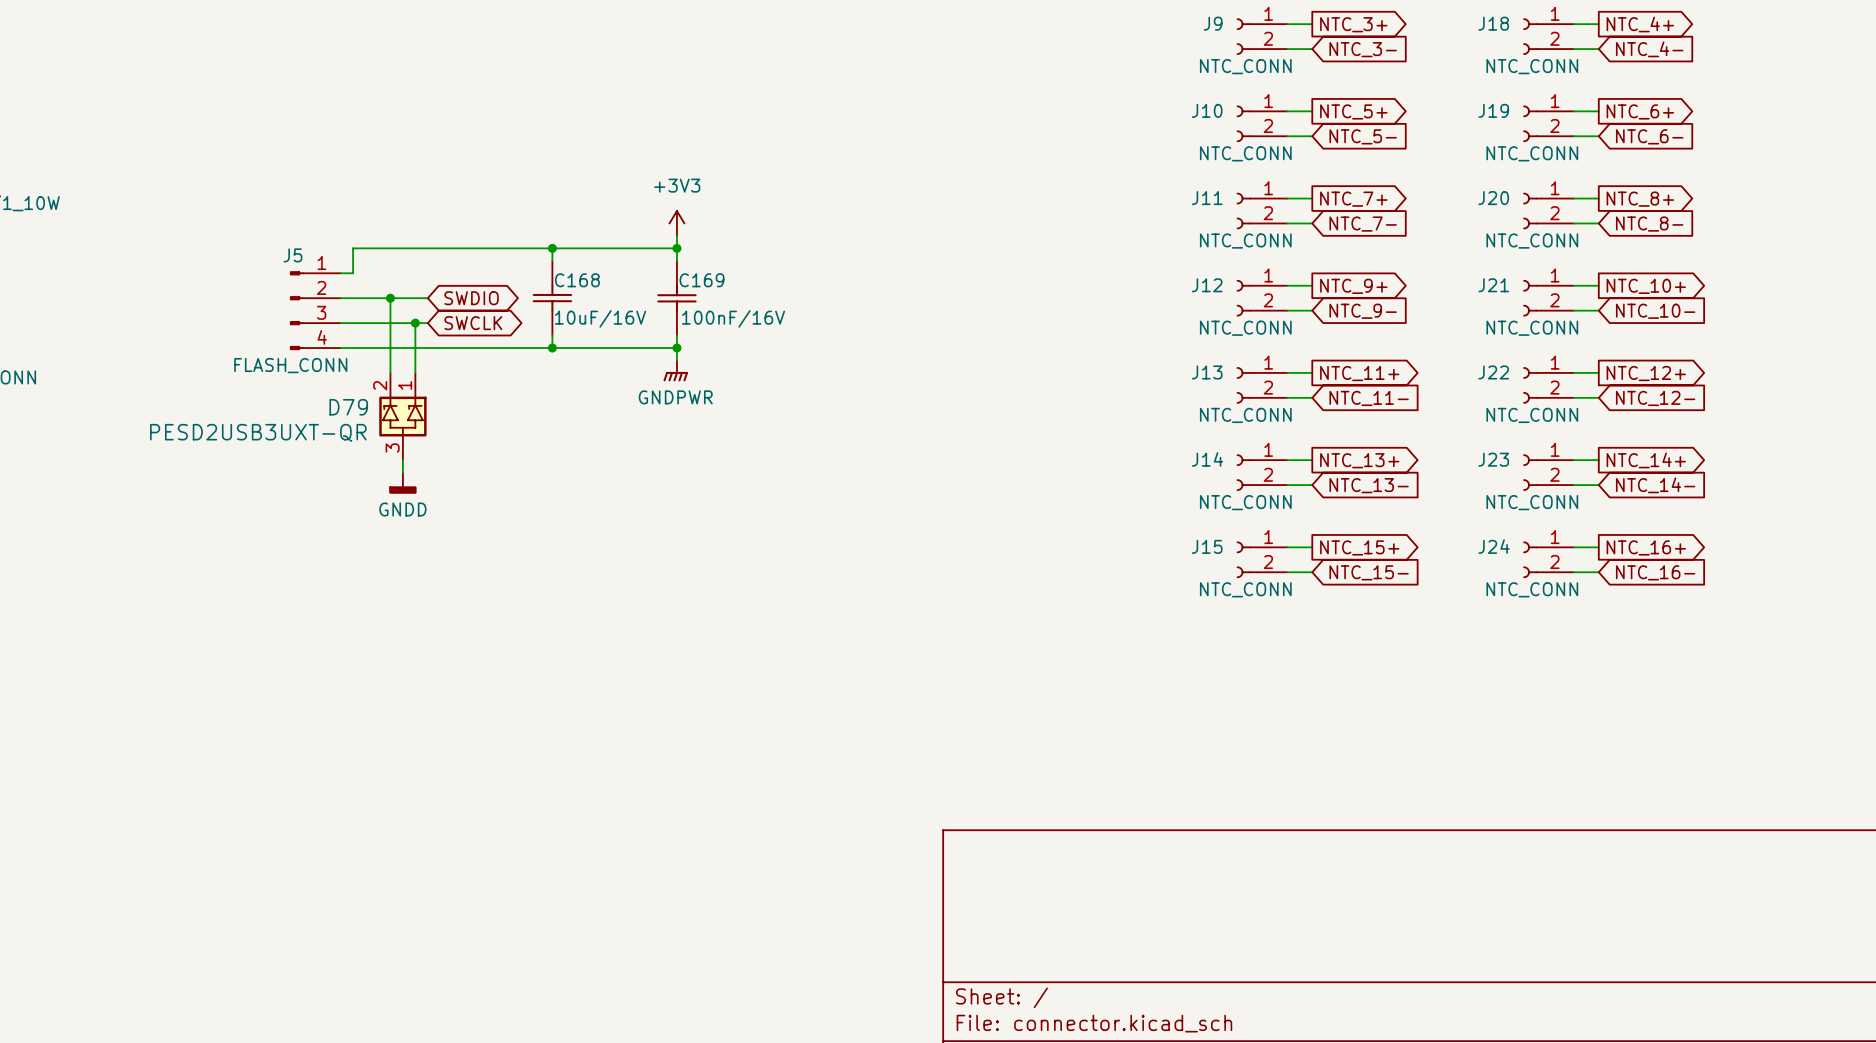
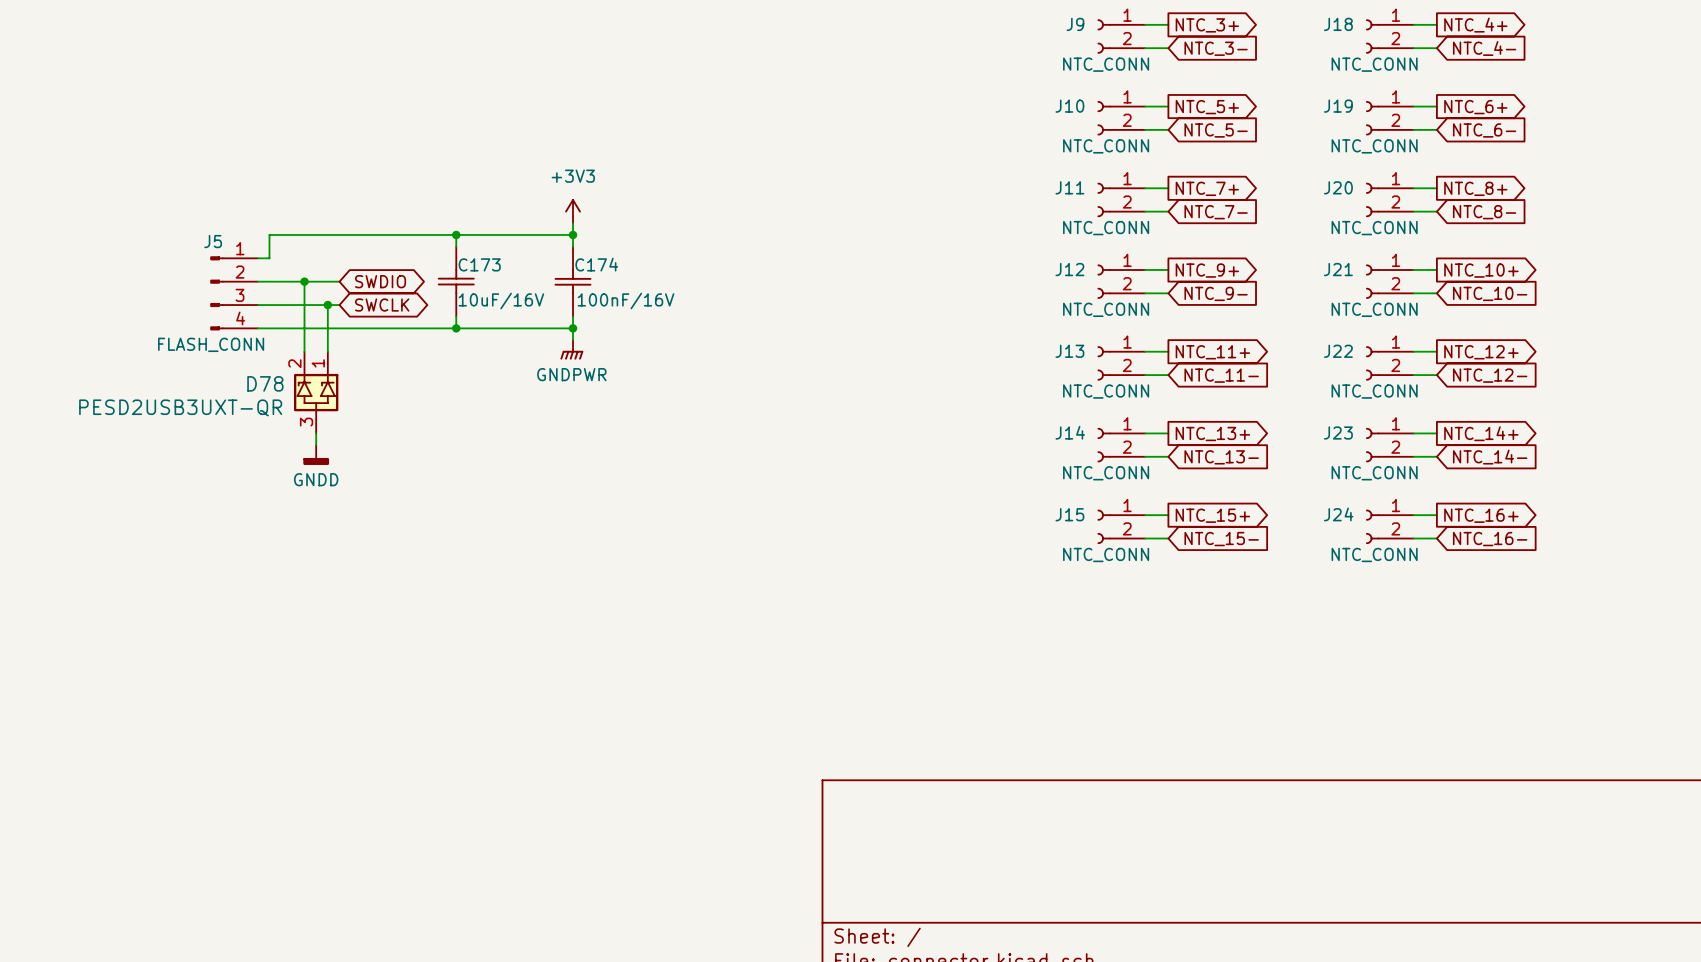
C168 name: C168 (577, 280) -> C173 (479, 264)
C169 name: C169 (701, 280) -> C174 (596, 264)
D79 name: D79 (348, 407) -> D78 (265, 383)

